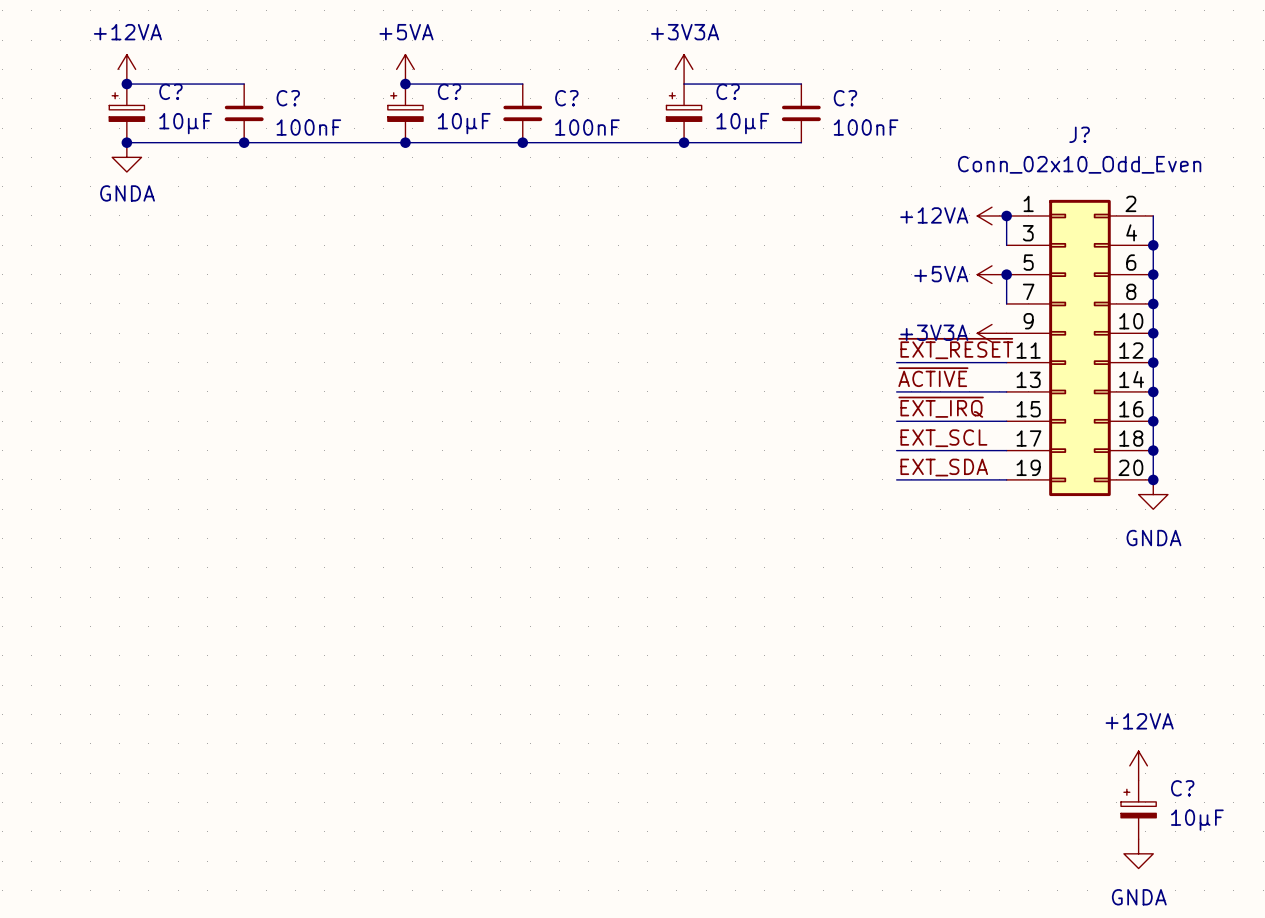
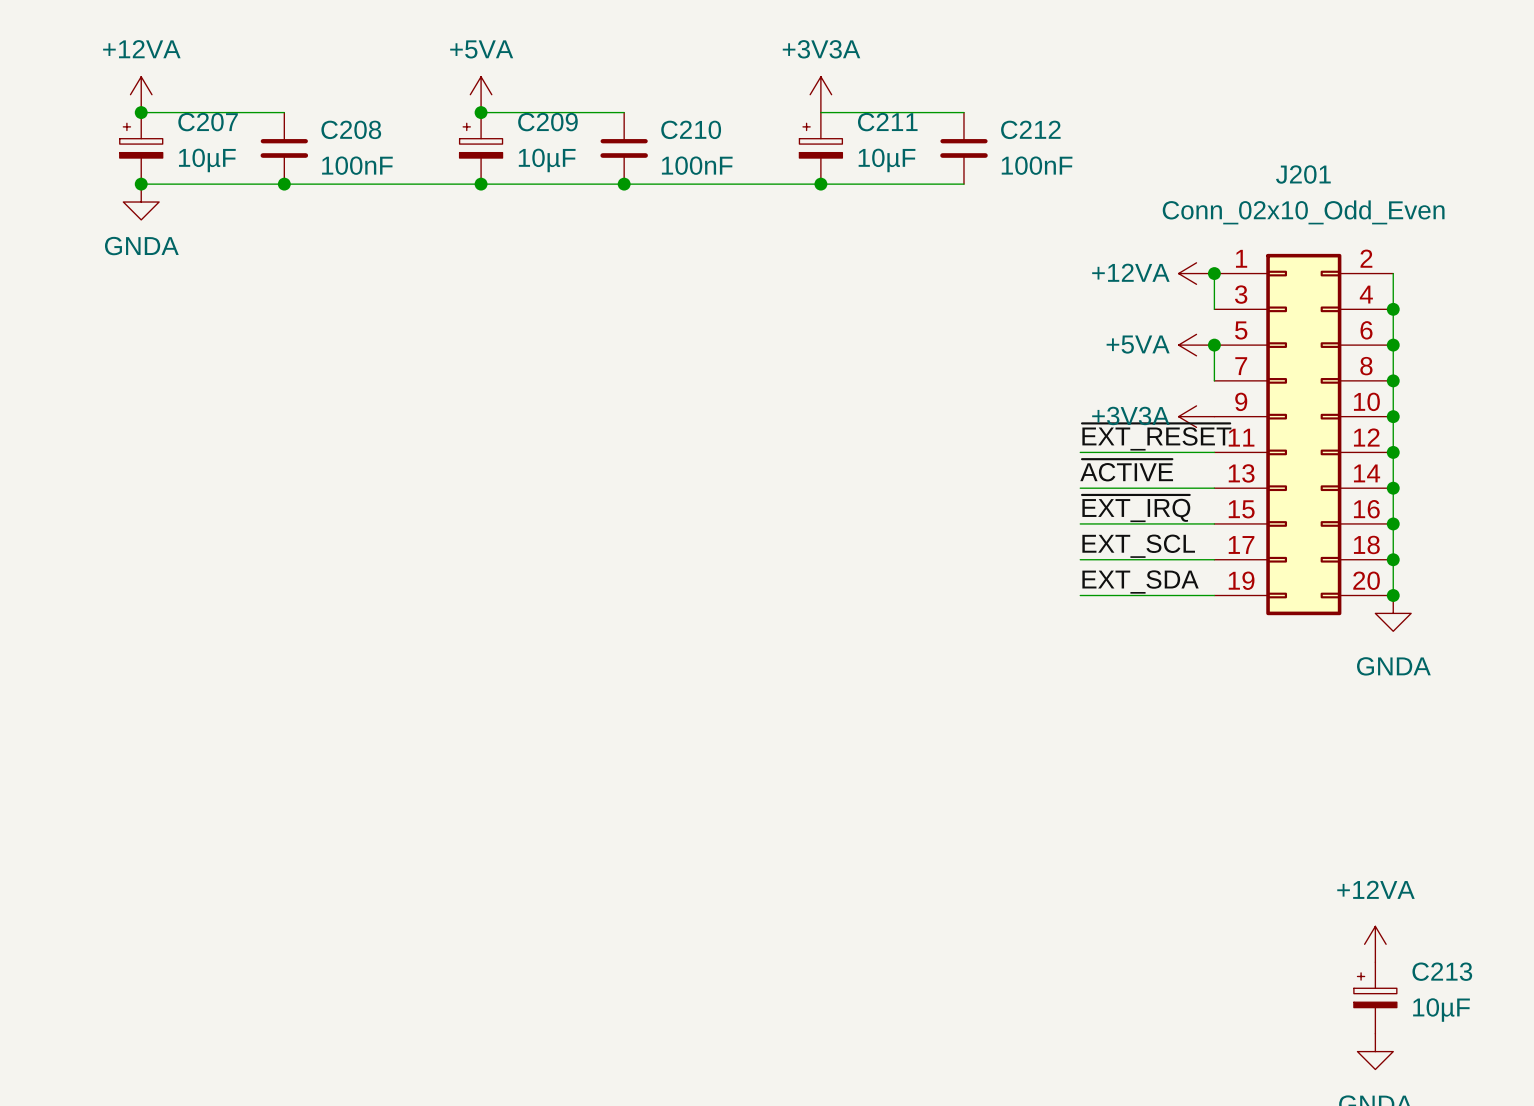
C? name: C? (170, 91) -> C207 (208, 122)
C? name: C? (449, 91) -> C209 (547, 122)
C? name: C? (728, 91) -> C211 (887, 122)
C? name: C? (288, 98) -> C208 (351, 129)
C? name: C? (566, 98) -> C210 (691, 129)
C? name: C? (845, 98) -> C212 (1030, 129)
J? name: J? (1079, 134) -> J201 (1303, 174)
C? name: C? (1182, 788) -> C213 (1442, 971)

